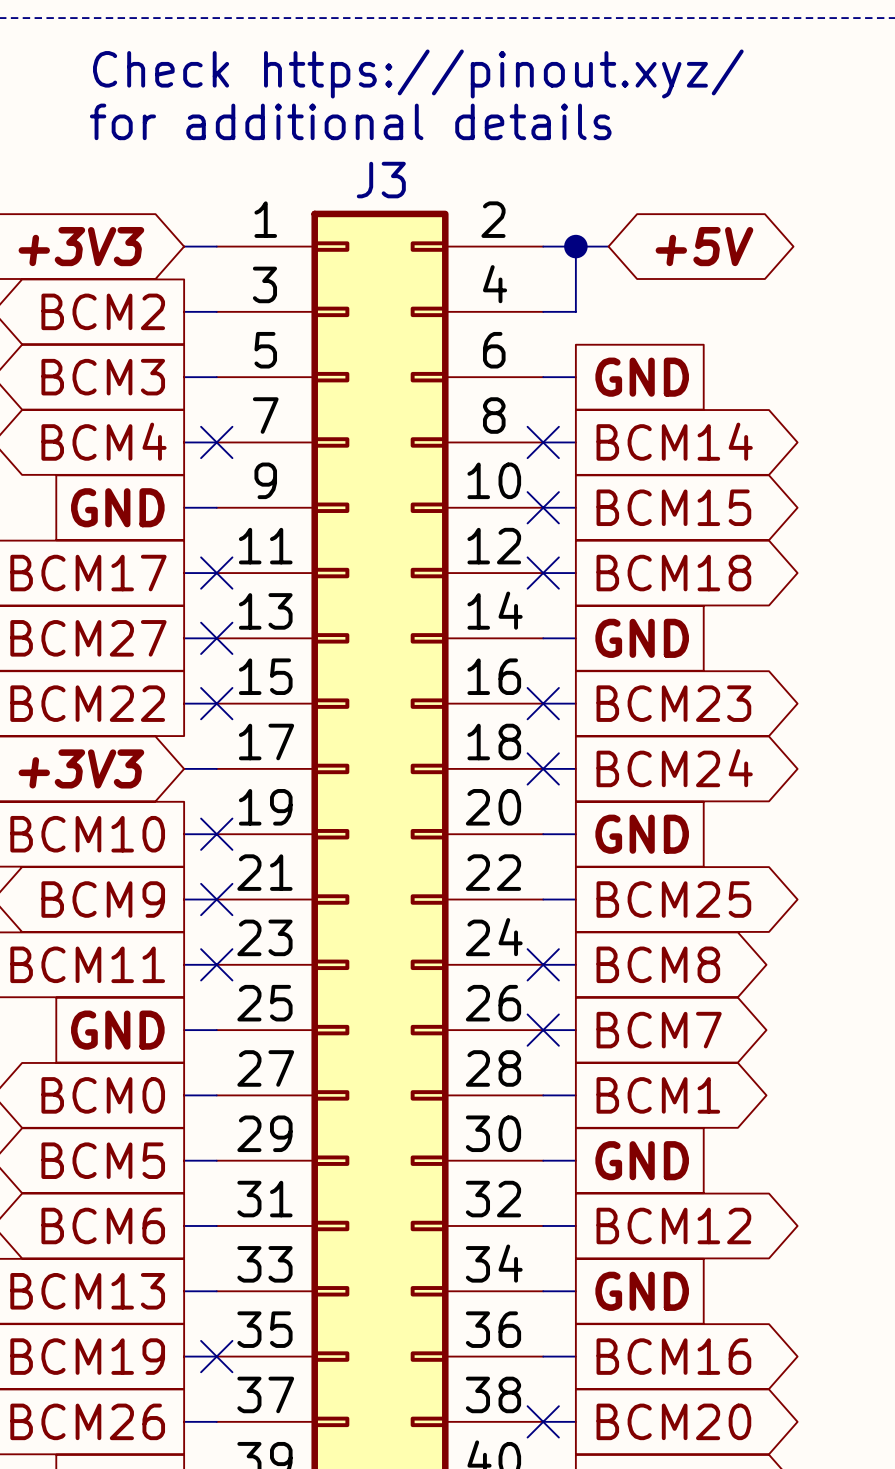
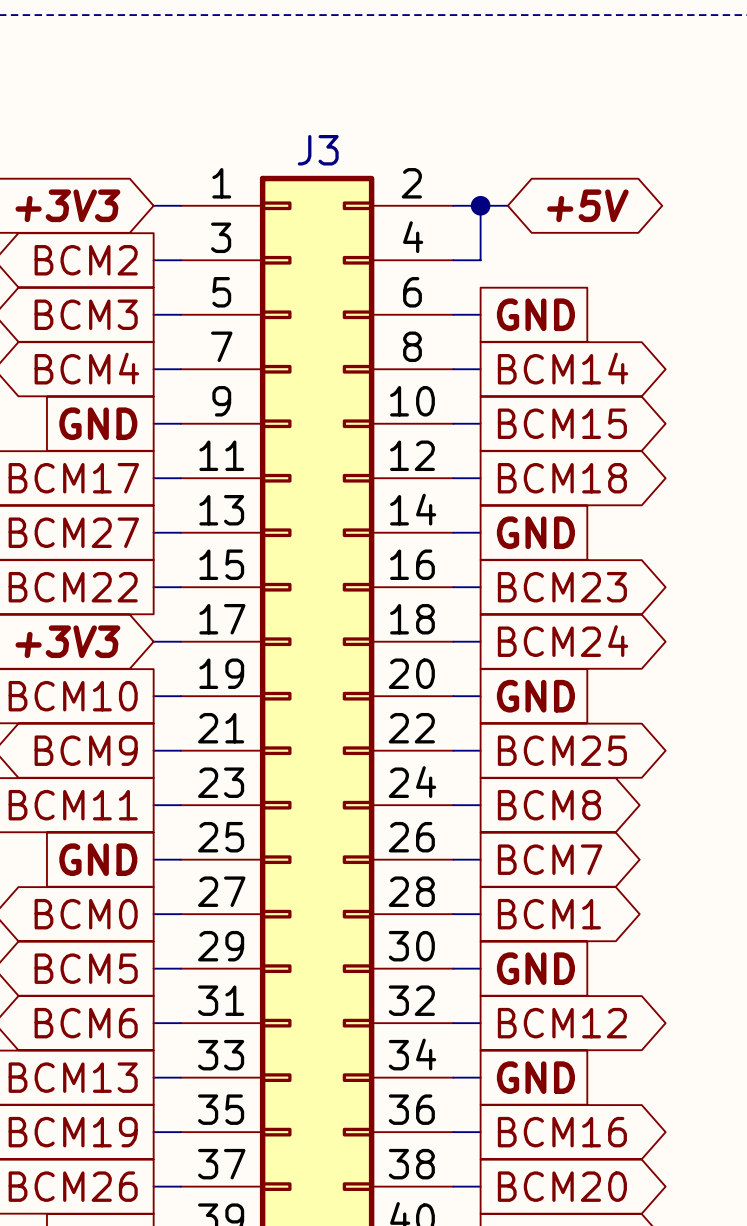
text: Check https://pinout.xyz/ (418, 73) -> none
text: for additional details (350, 121) -> none
no-connect mark: (216, 442) -> none
no-connect mark: (543, 442) -> none
no-connect mark: (543, 507) -> none
no-connect mark: (216, 573) -> none
no-connect mark: (543, 573) -> none
no-connect mark: (216, 638) -> none
no-connect mark: (216, 703) -> none
no-connect mark: (543, 703) -> none
no-connect mark: (543, 768) -> none
no-connect mark: (216, 834) -> none
no-connect mark: (216, 899) -> none
no-connect mark: (216, 964) -> none
no-connect mark: (543, 964) -> none
no-connect mark: (543, 1030) -> none
no-connect mark: (216, 1356) -> none
no-connect mark: (543, 1421) -> none

